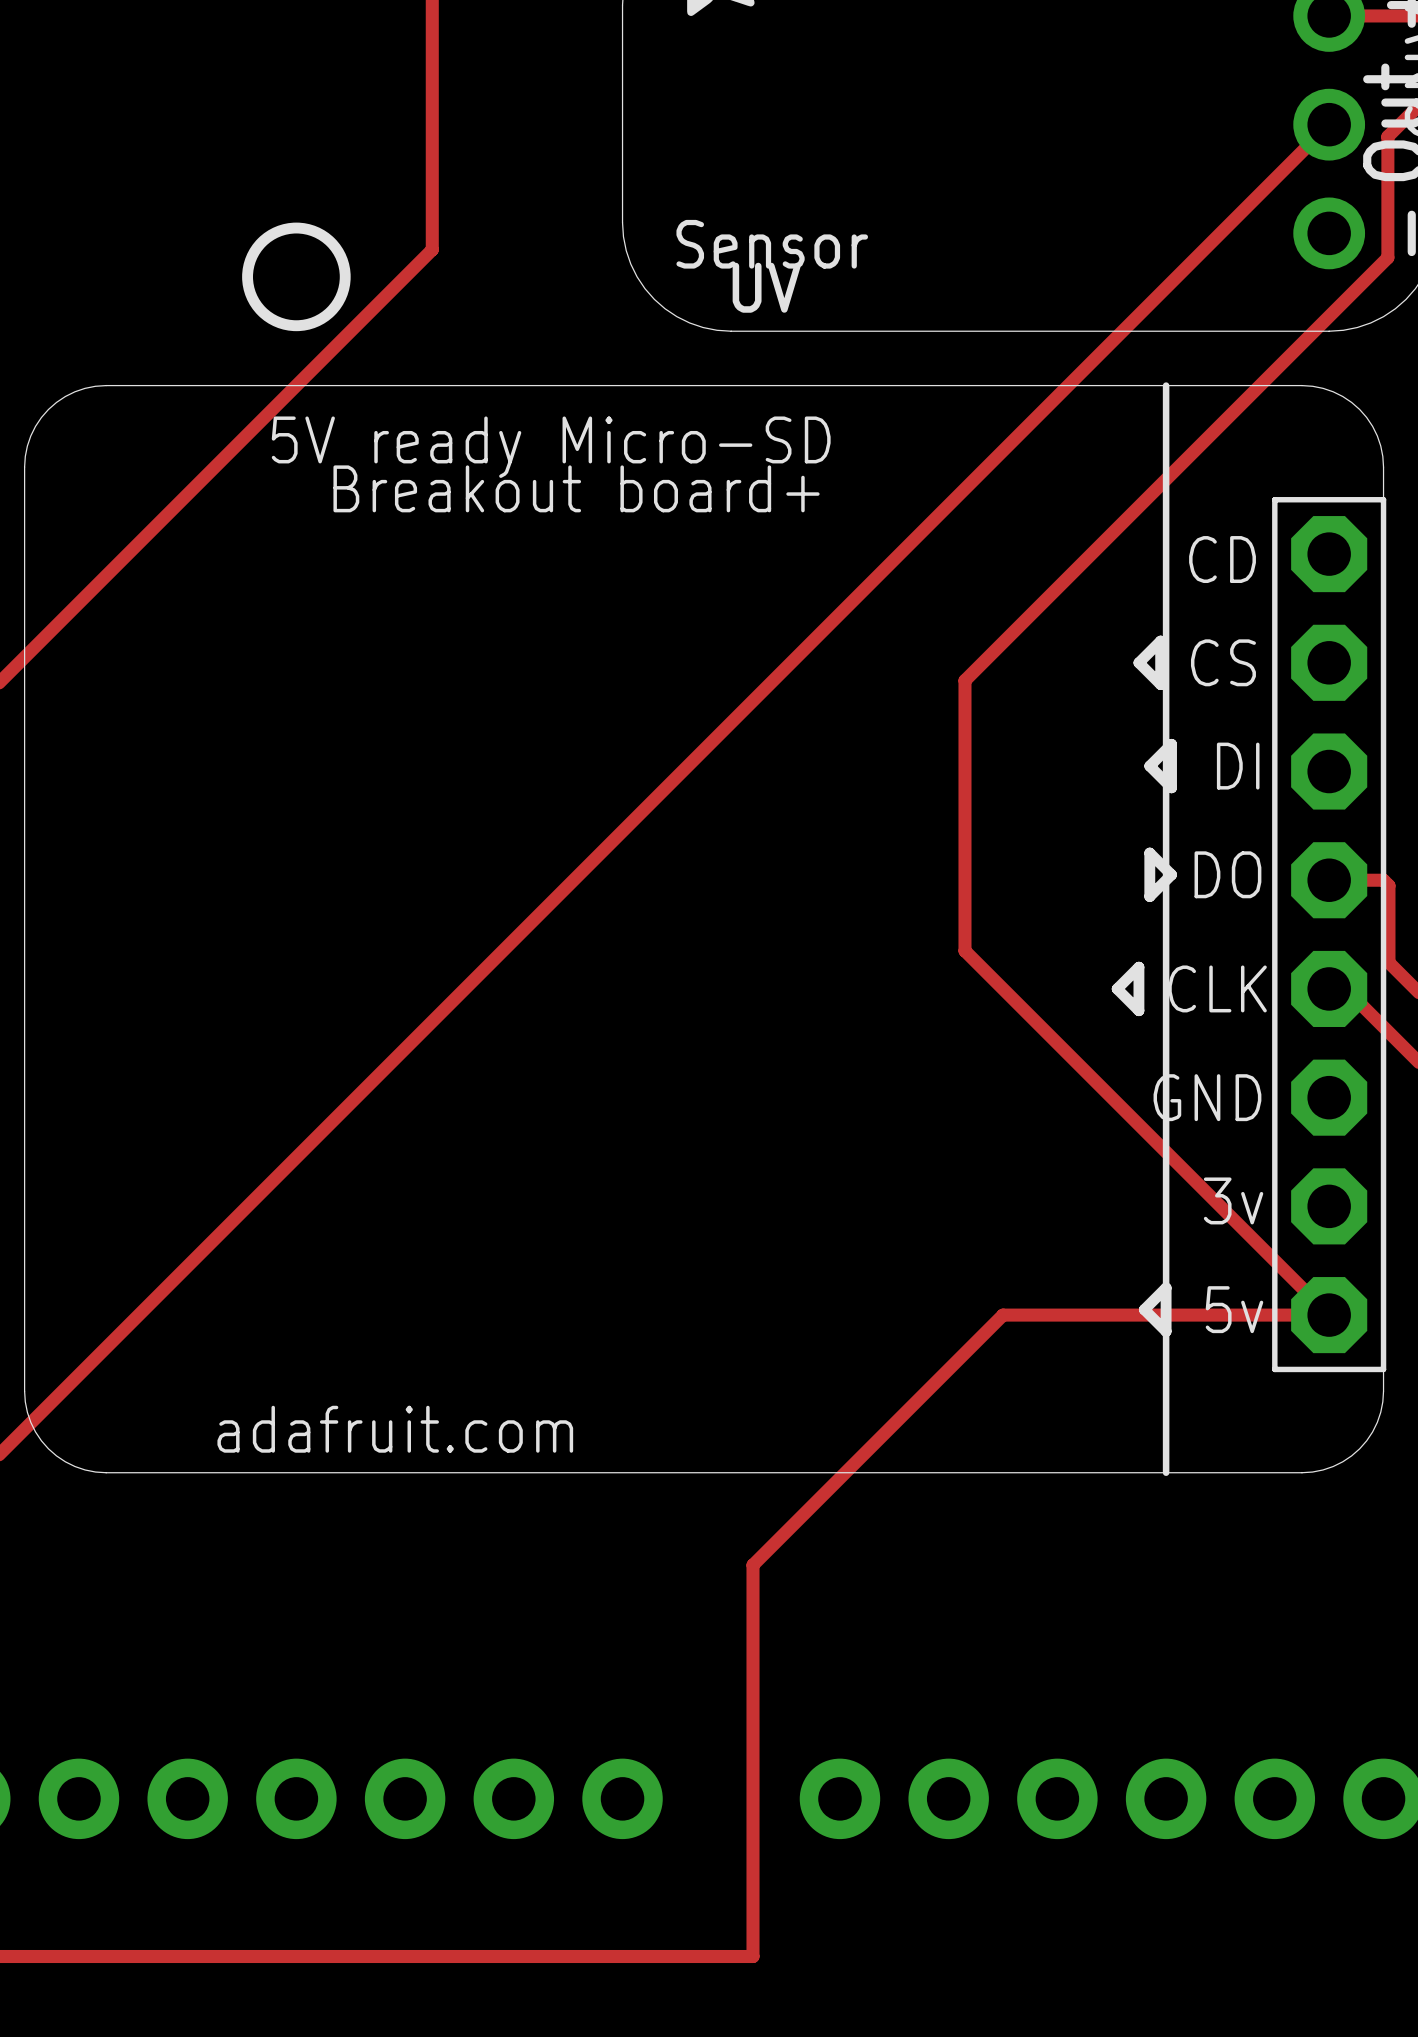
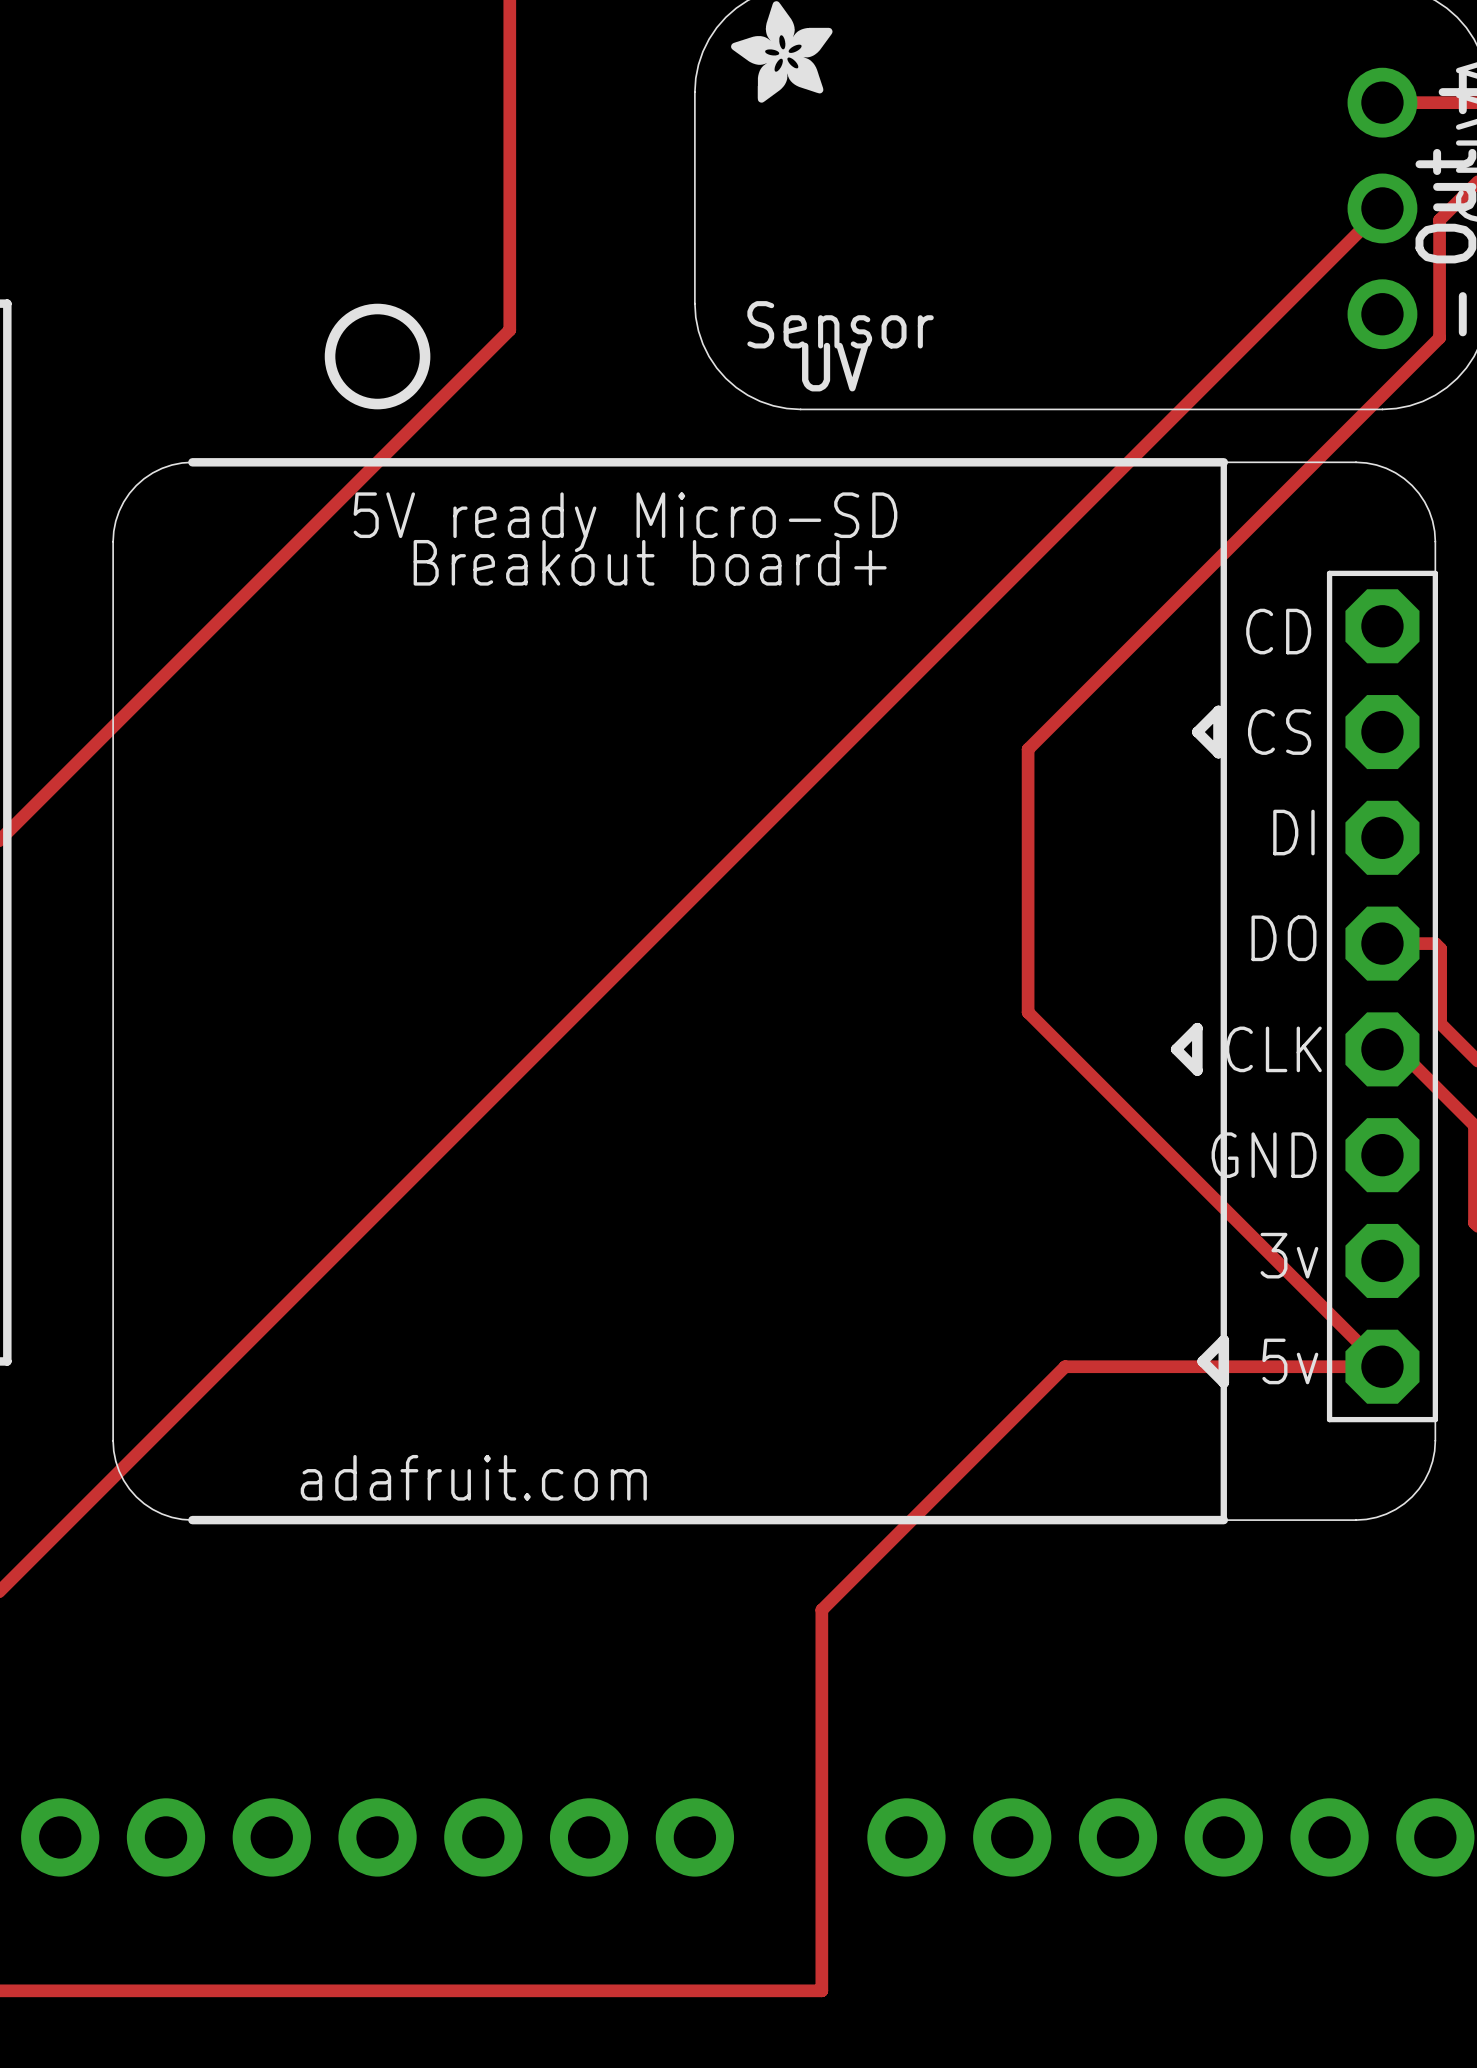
line width: thin (106, 385) (1166, 385) -> thick (192, 462) (1223, 462)
line: (1171, 744) (1171, 787) (1149, 766) (1171, 744) -> none
line: (1149, 853) (1149, 896) (1171, 874) (1149, 853) -> none
line width: thin (106, 1472) (1166, 1472) -> thick (192, 1520) (1223, 1520)

